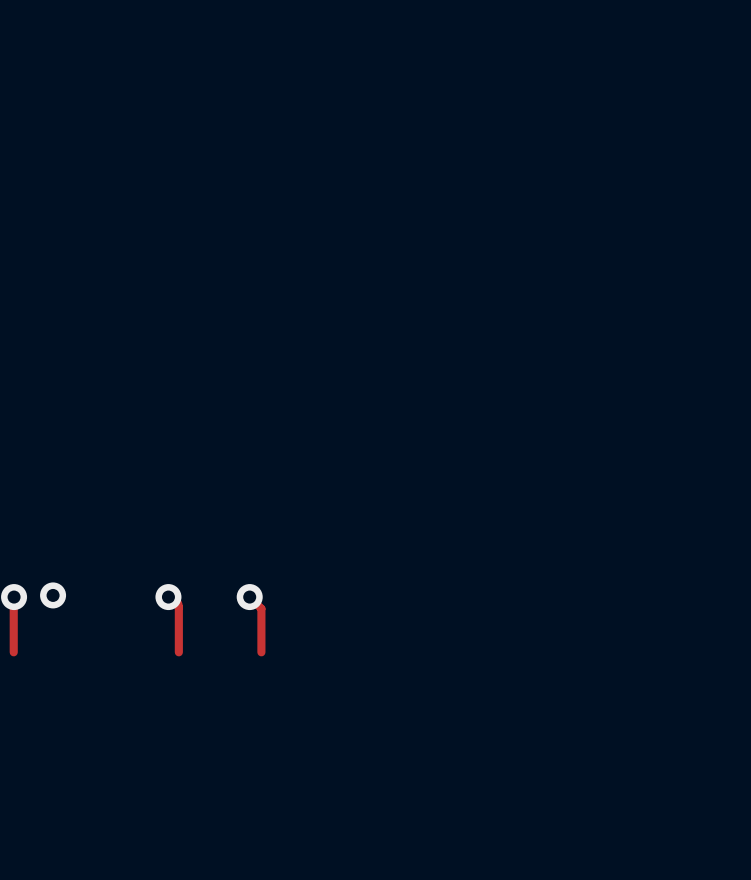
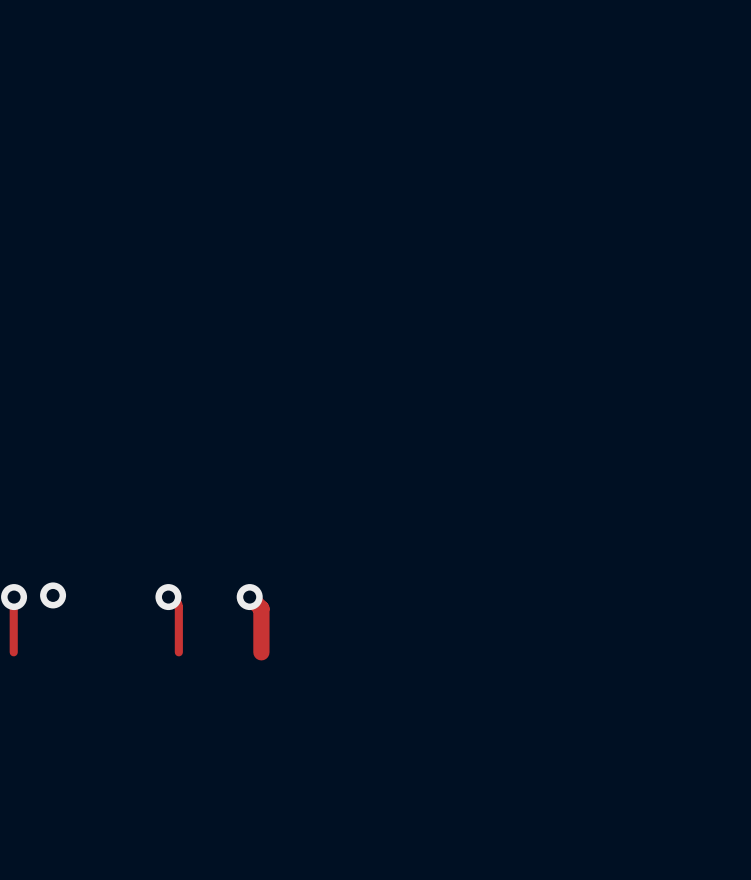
track width: thin (249, 597) (261, 608) (261, 652) -> thick (249, 597) (261, 608) (261, 652)

